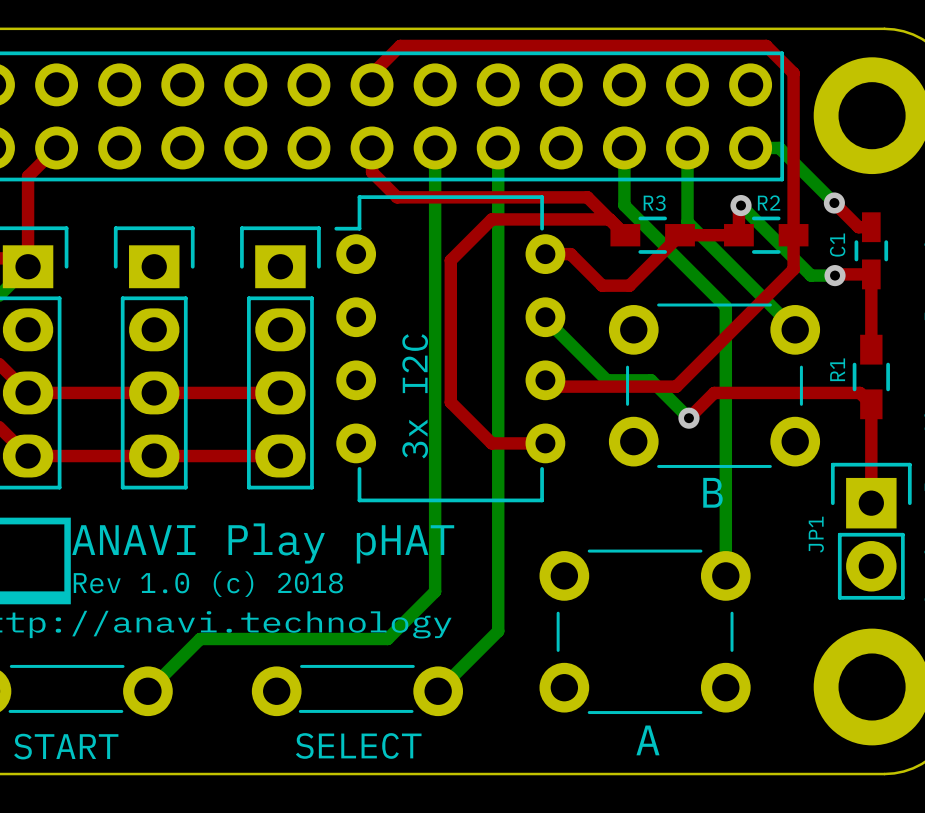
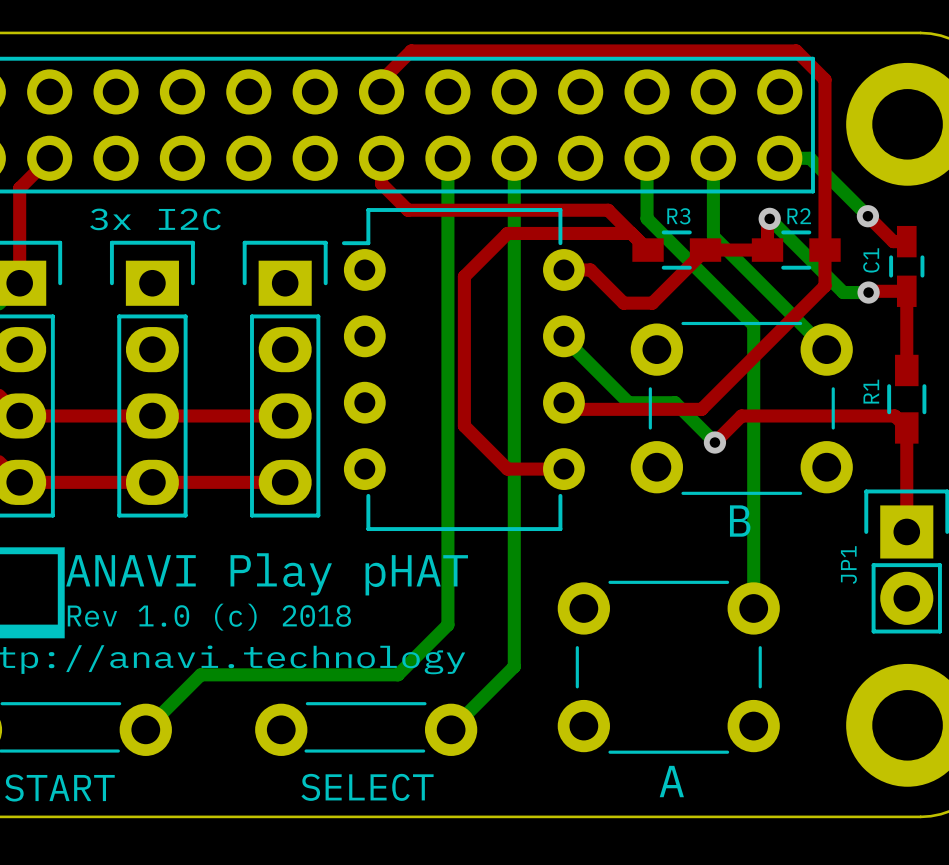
text rotation: 0° (415, 396) -> 90° clockwise (155, 219)
text position: 3x I2C (415, 396) -> 3x I2C (155, 219)

